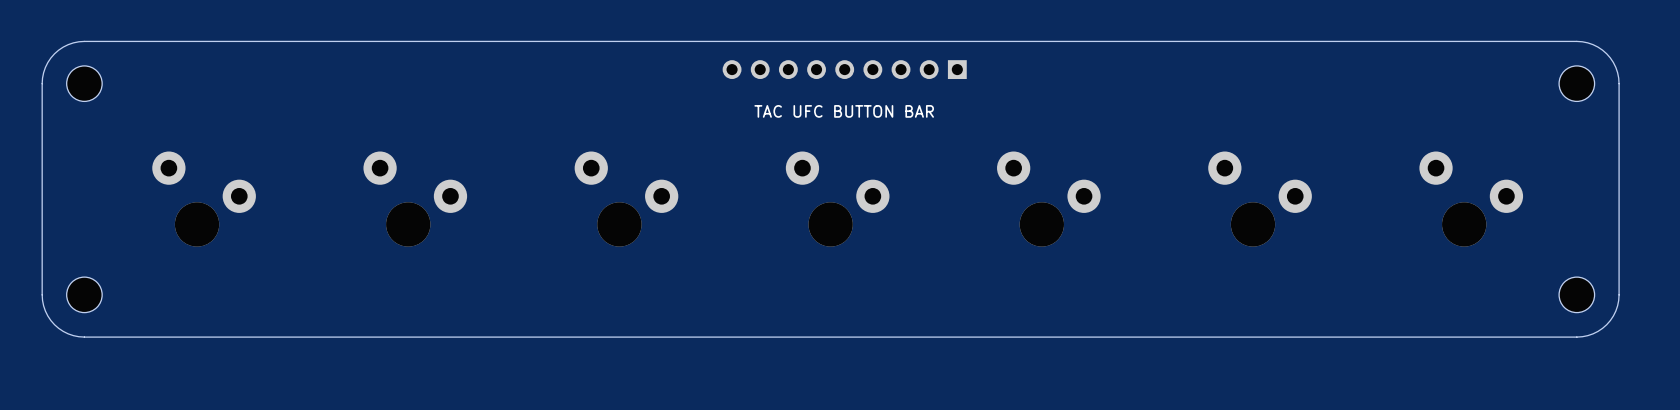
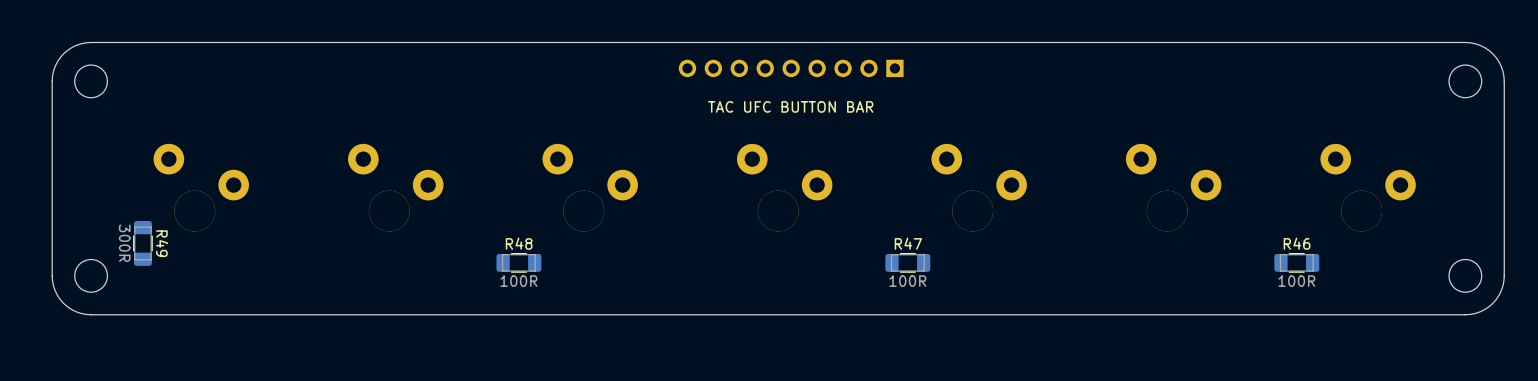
R49: none -> 300R (142, 243)
R48: none -> 100R (518, 262)
R47: none -> 100R (907, 262)
R46: none -> 100R (1296, 262)

